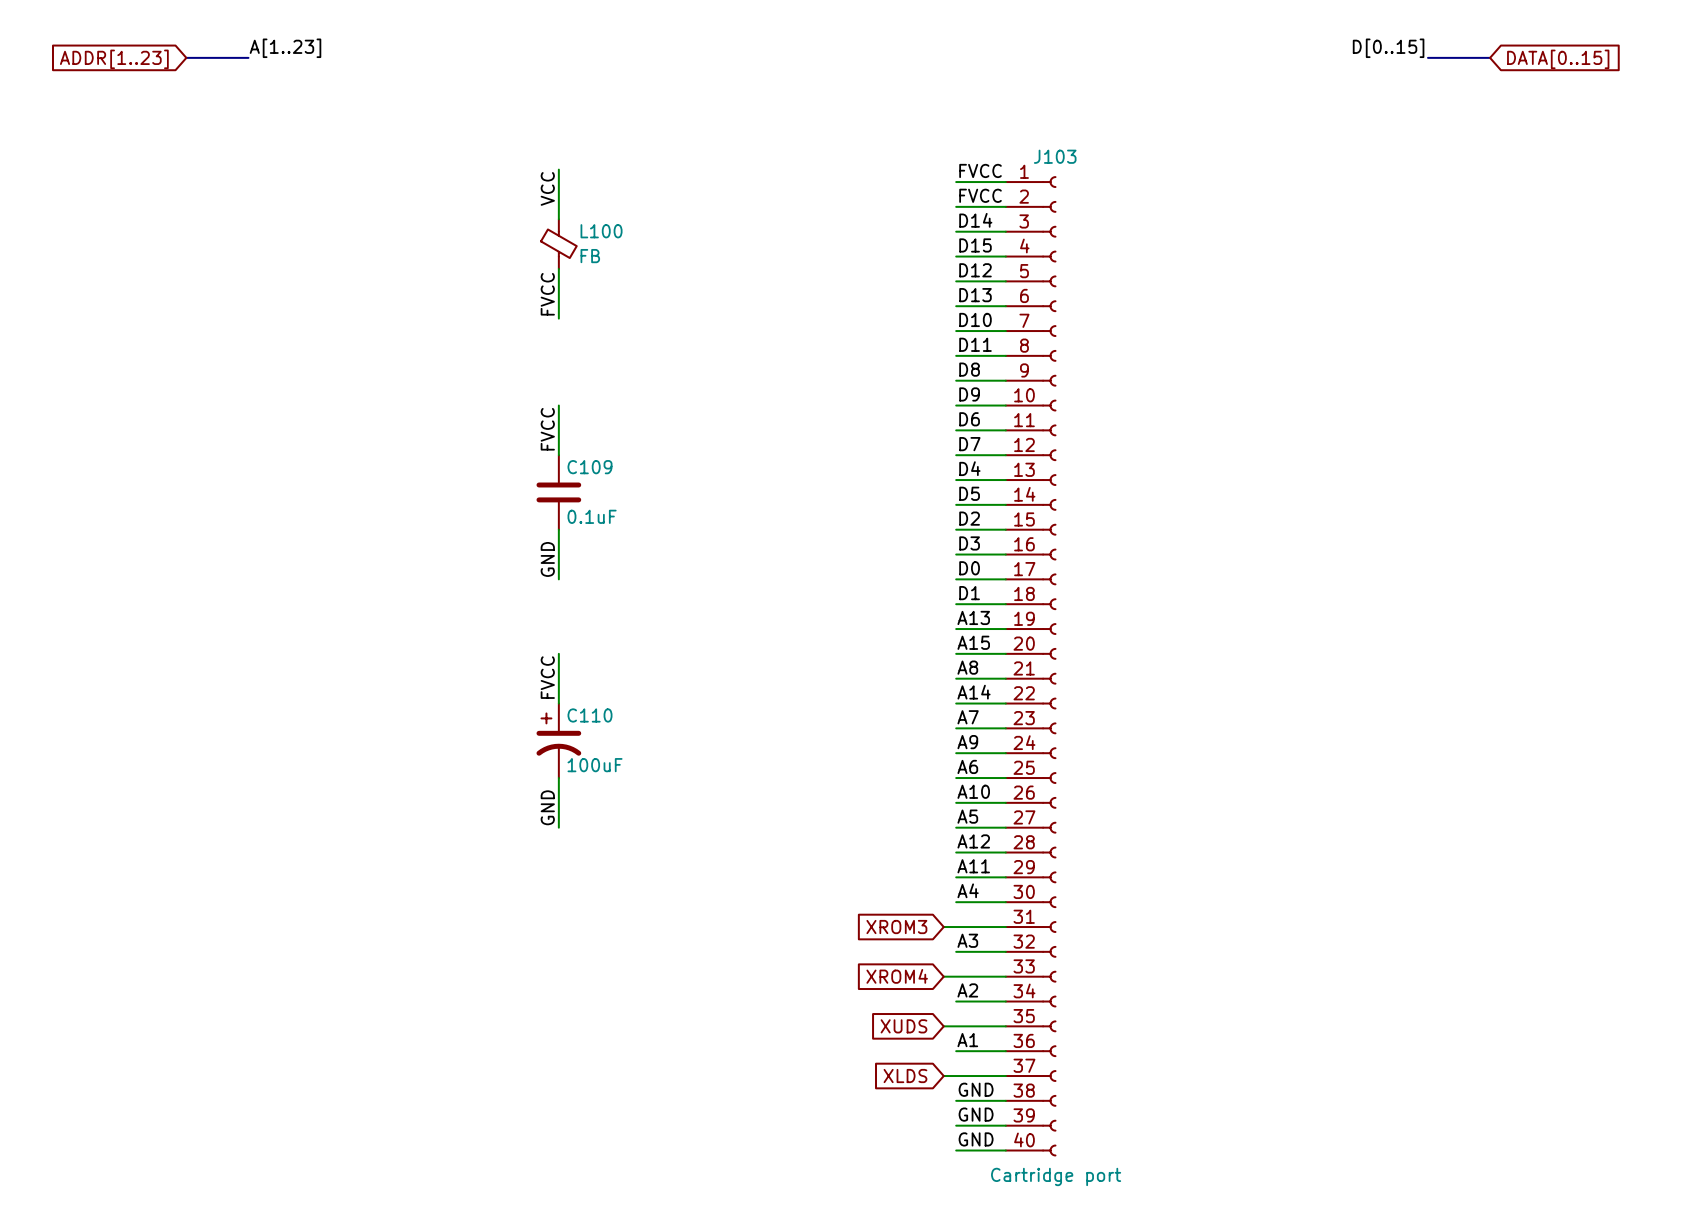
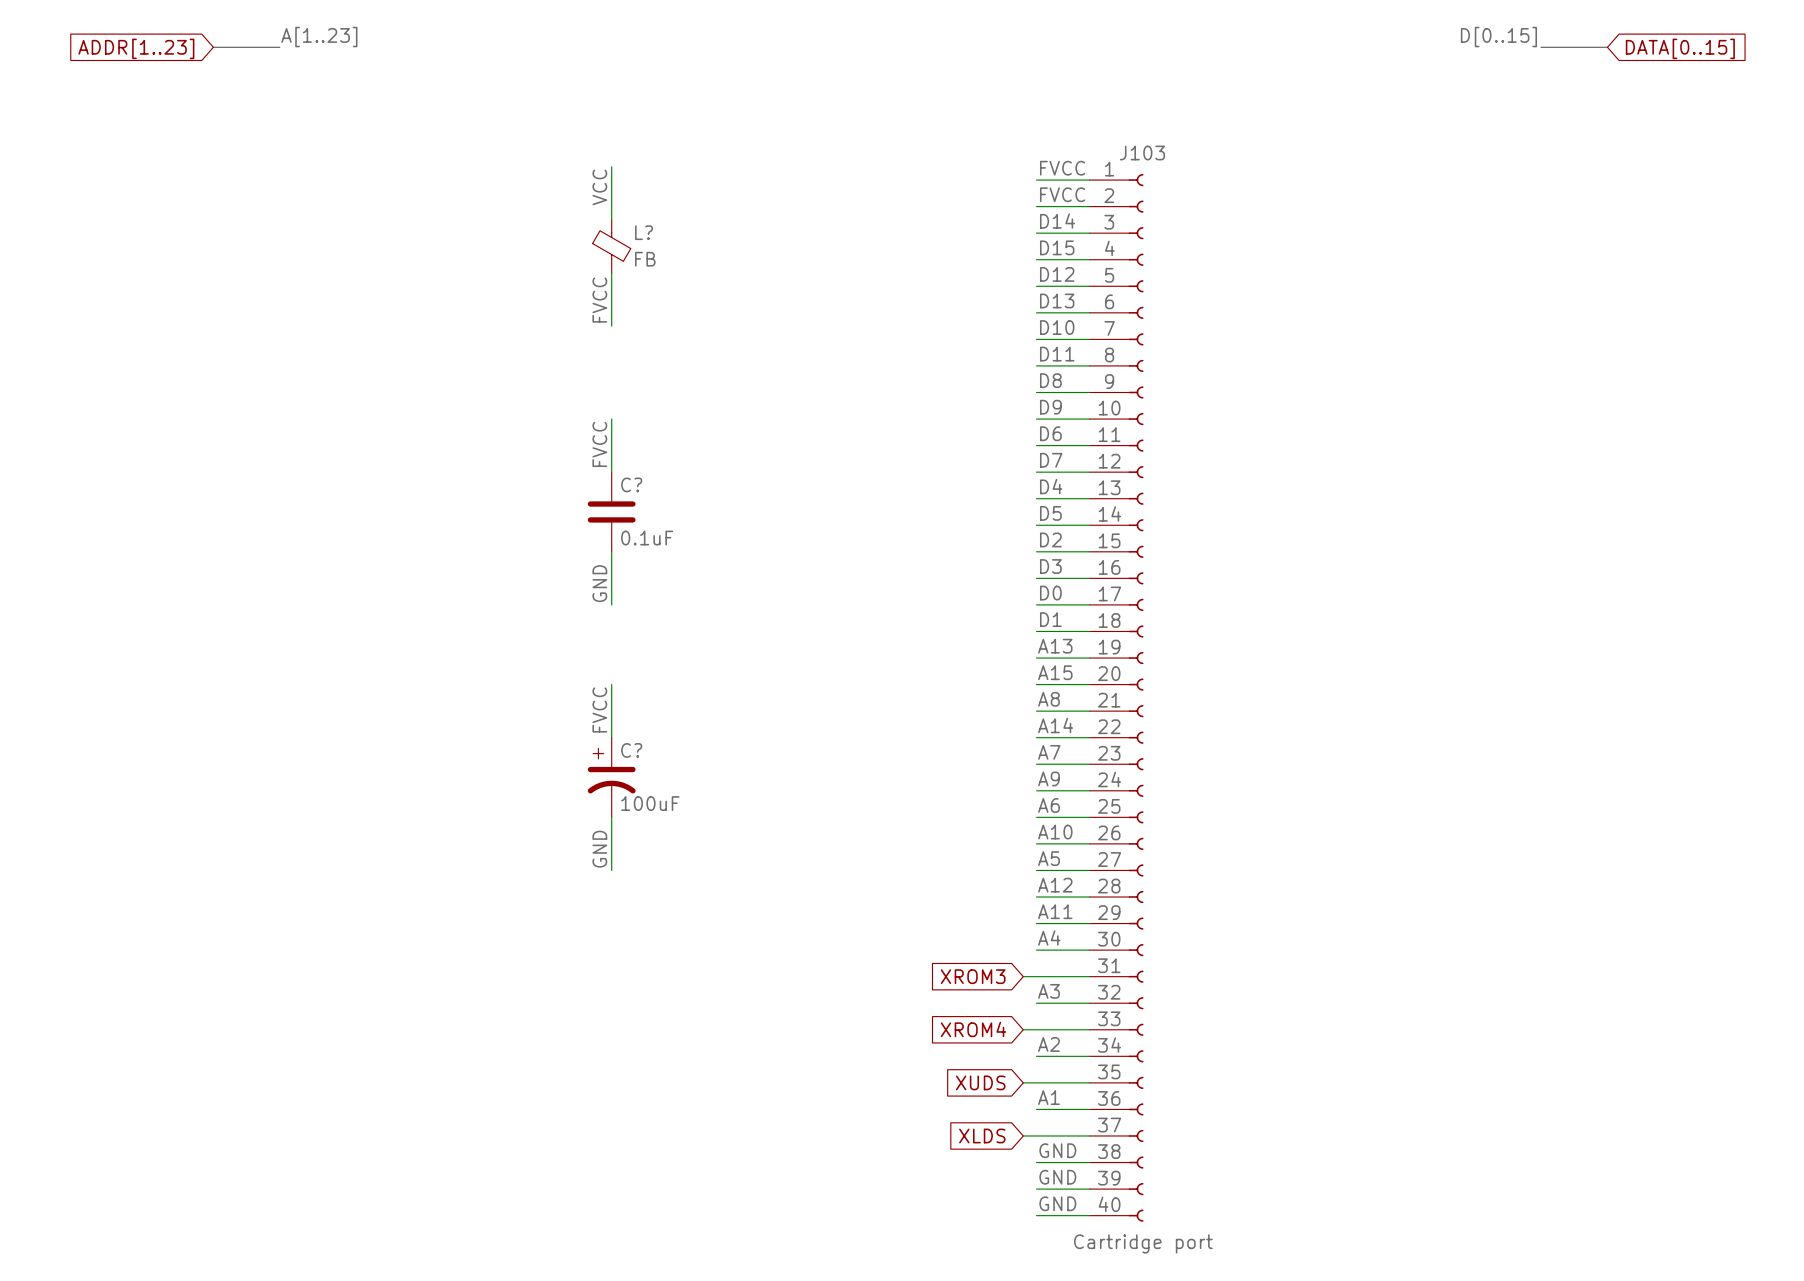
L100 name: L100 (601, 231) -> L? (644, 232)
C109 name: C109 (589, 467) -> C? (631, 484)
C110 name: C110 (589, 715) -> C? (631, 750)

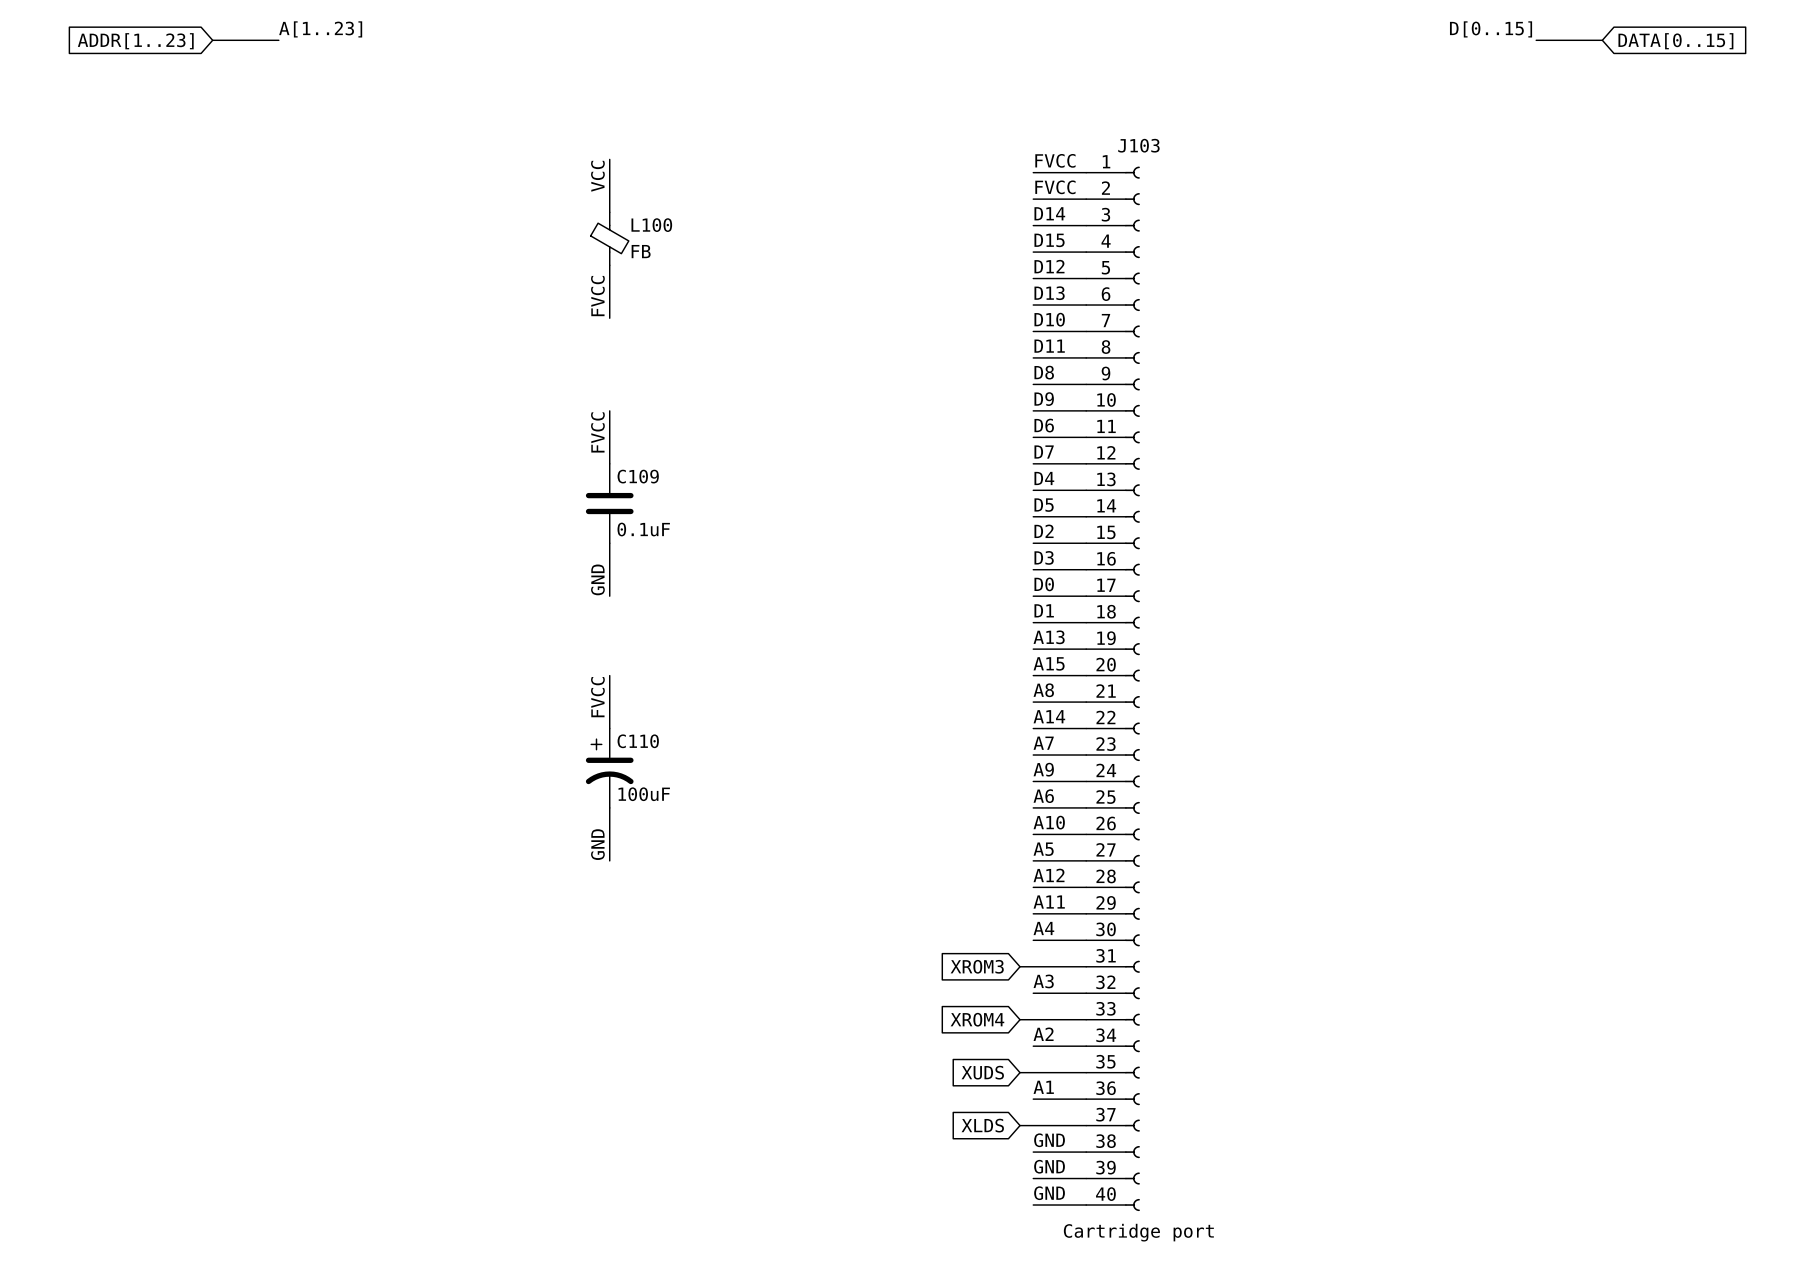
L? name: L? (644, 232) -> L100 (651, 225)
C? name: C? (631, 484) -> C109 (638, 476)
C? name: C? (631, 750) -> C110 (638, 741)

